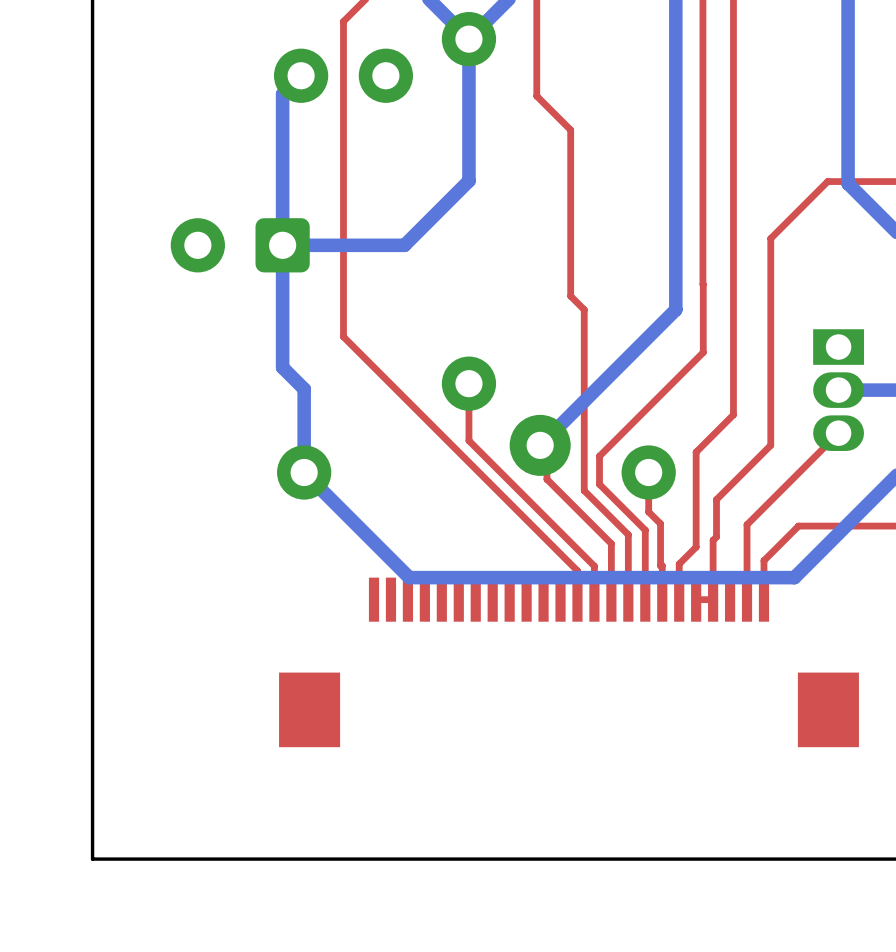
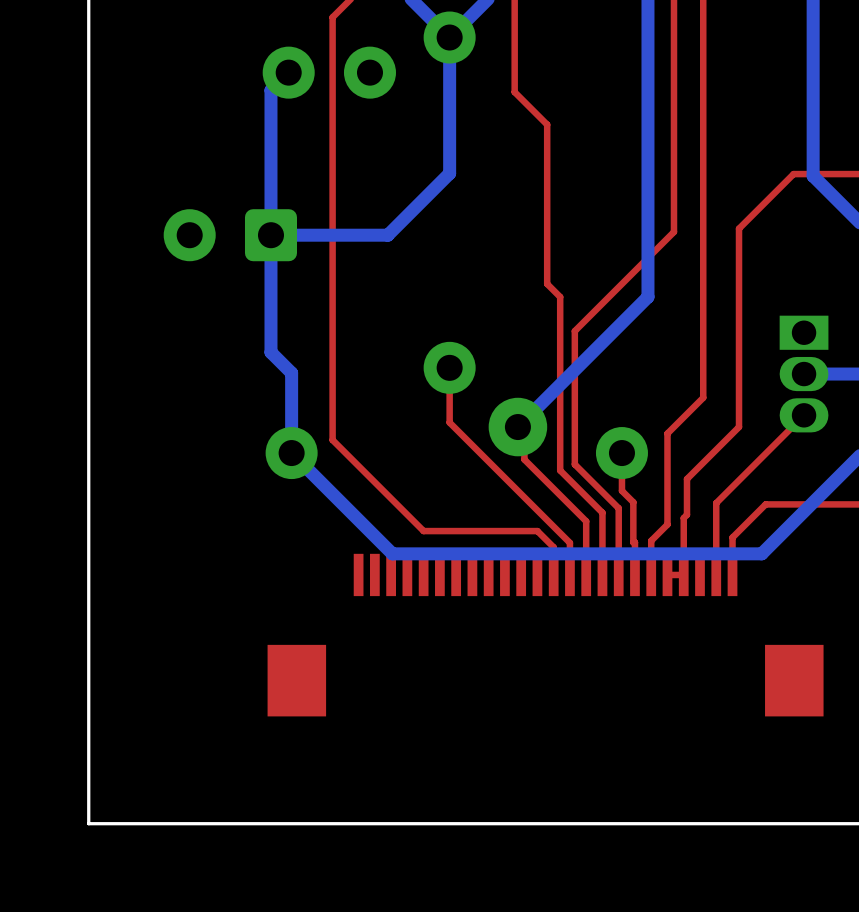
top track: (346, 18) (343, 21) (343, 336) (560, 553) -> (332, 17) (332, 440) (423, 531) (537, 531)
top track: (702, 241) (702, 284) -> none
top track: (703, 284) (703, 352) (599, 456) -> (673, 231) (574, 331) (574, 437)

